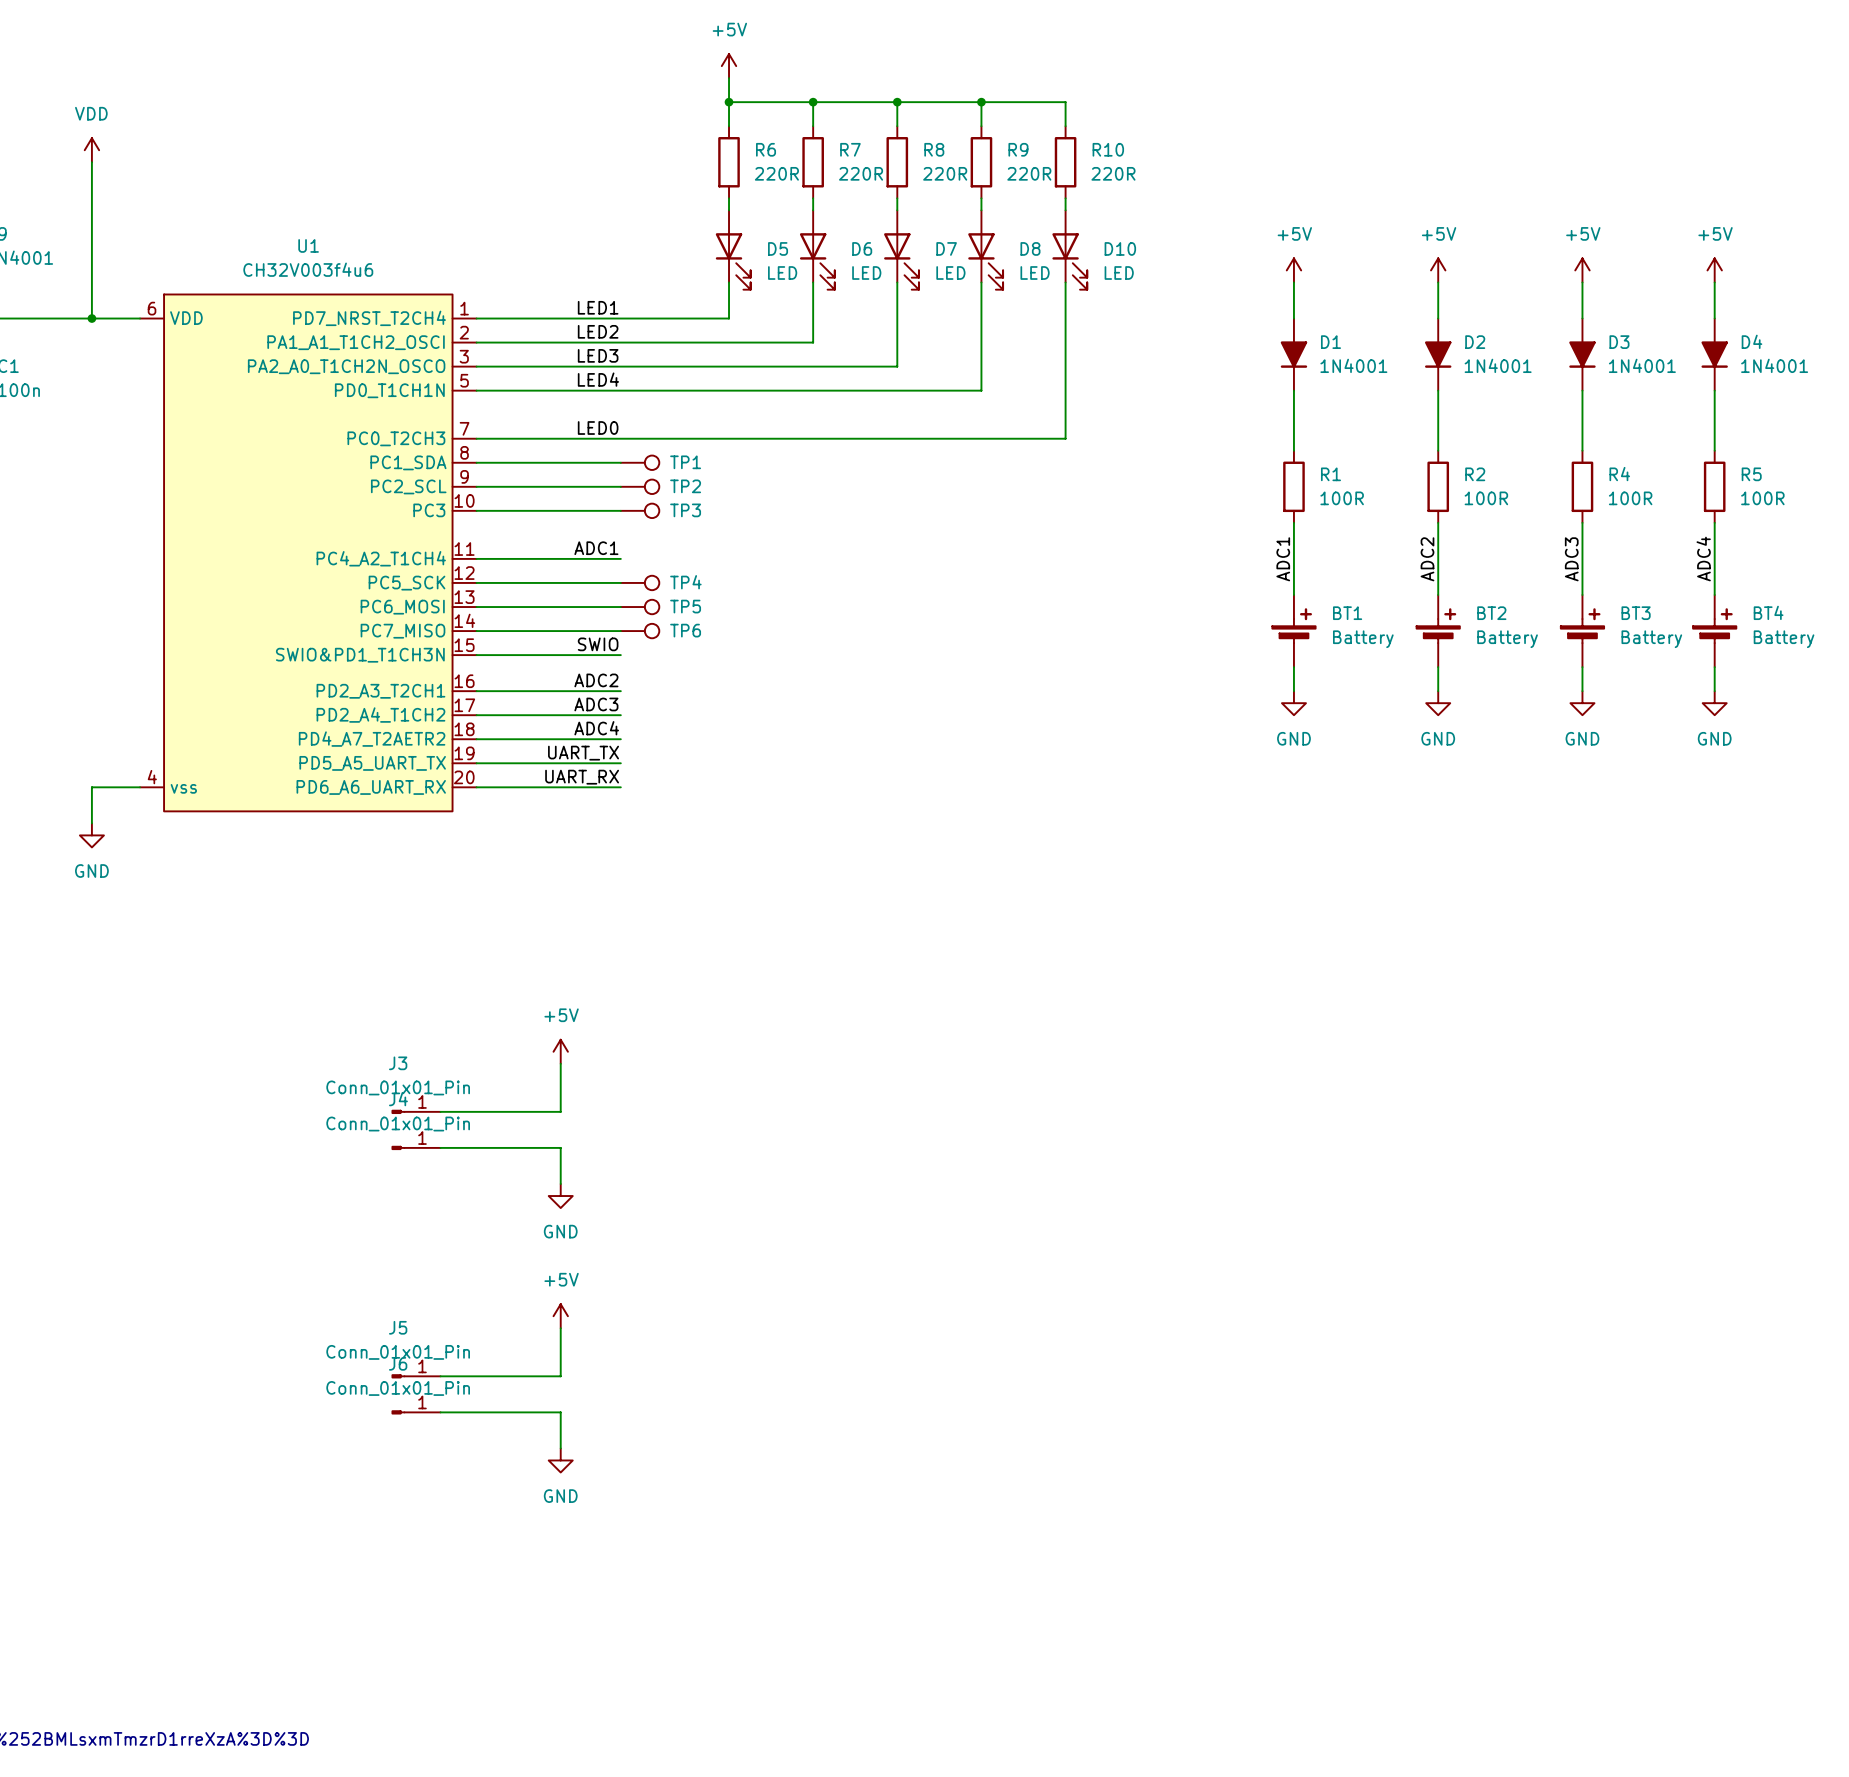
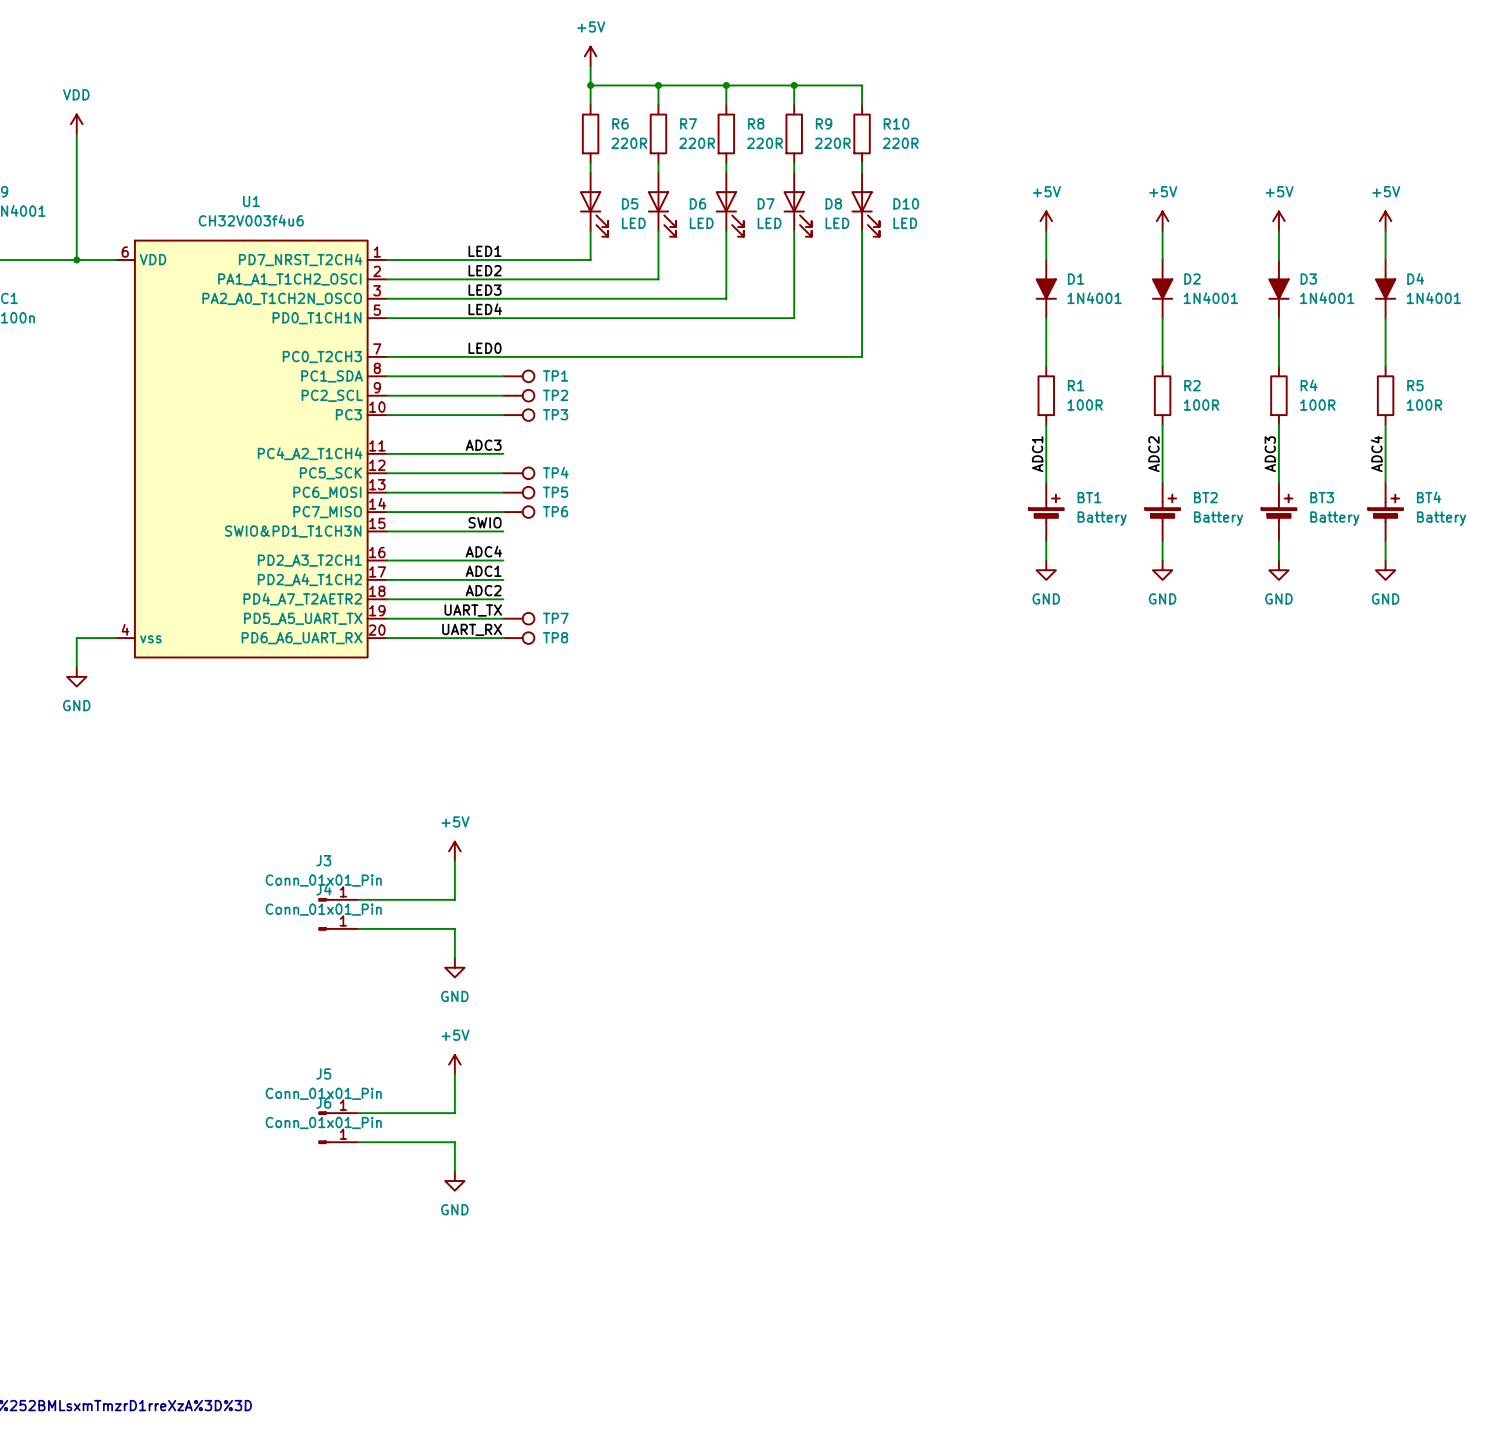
label: ADC1 (596, 548) -> ADC3 (483, 445)
label: ADC2 (596, 680) -> ADC4 (483, 551)
label: ADC3 (596, 704) -> ADC1 (483, 571)
label: ADC4 (596, 728) -> ADC2 (483, 590)
TP7: none -> (518, 618)
TP8: none -> (518, 638)

